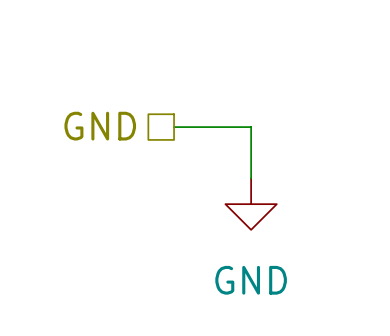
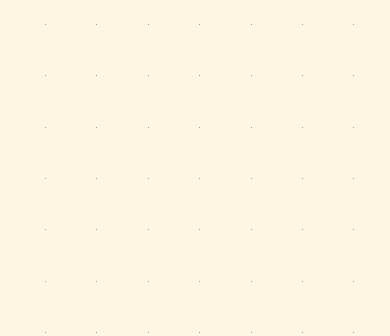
hierarchical label: GND (100, 126) -> none
wire: (174, 127) (251, 127) (251, 178) -> none
power symbol: GND (251, 204) -> none

